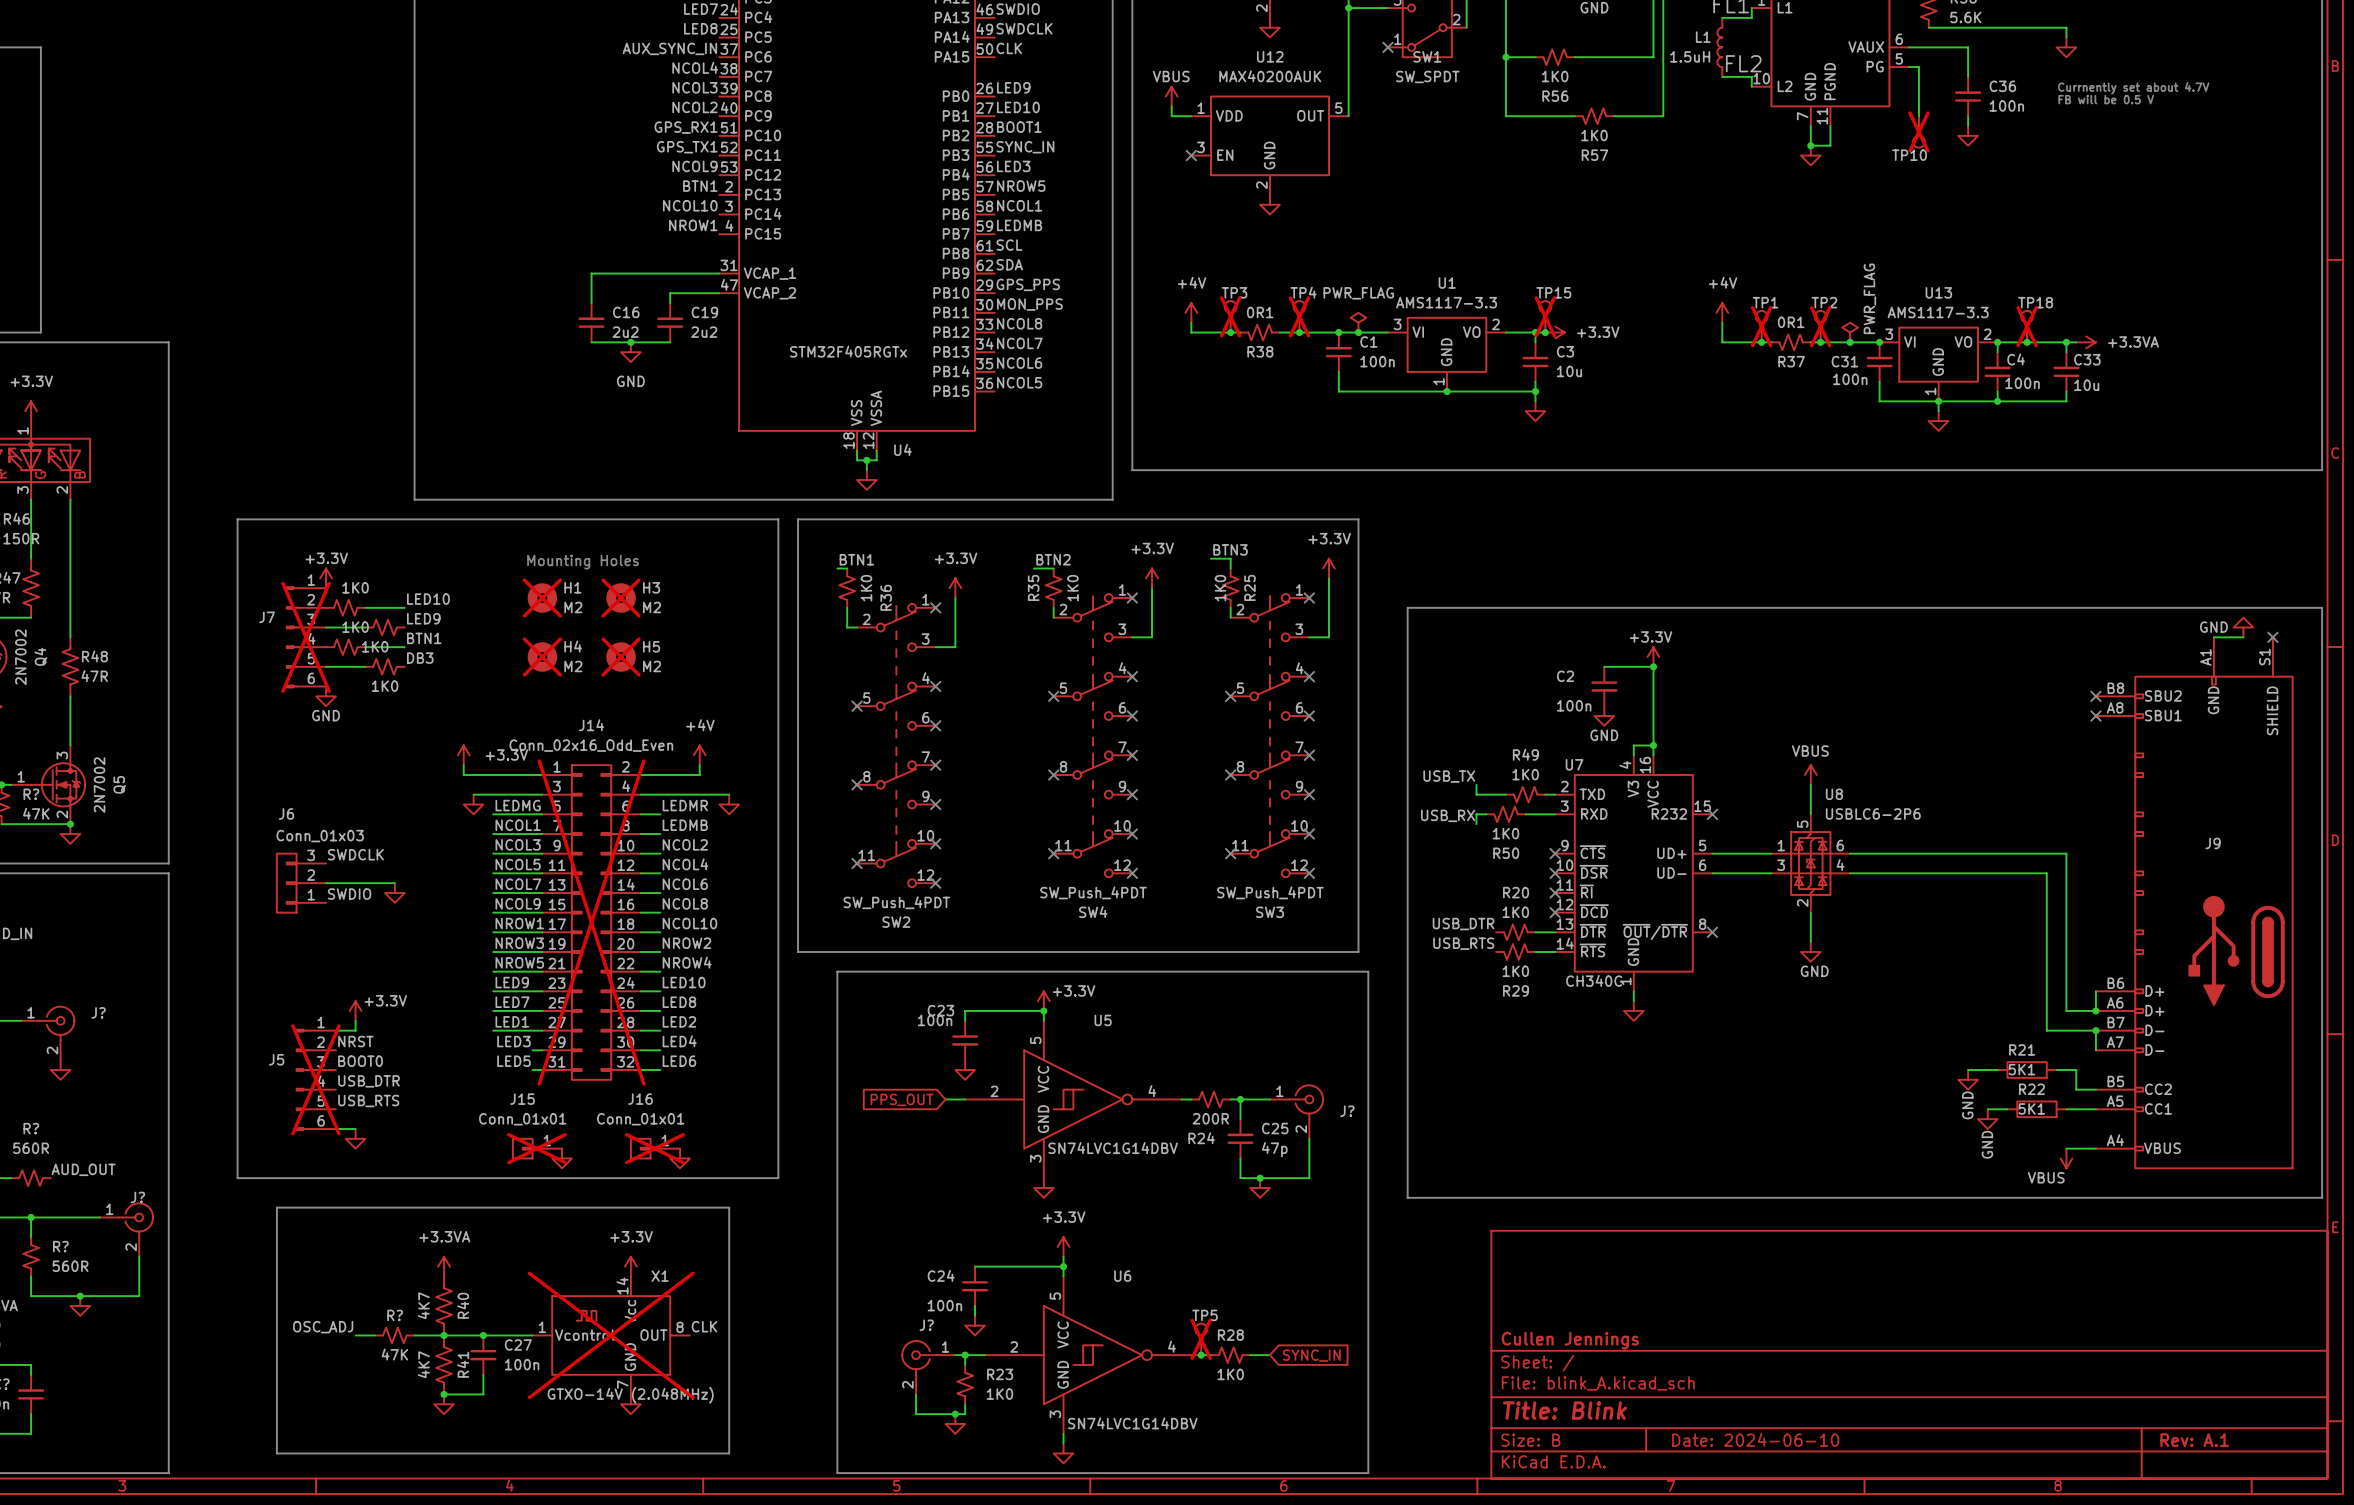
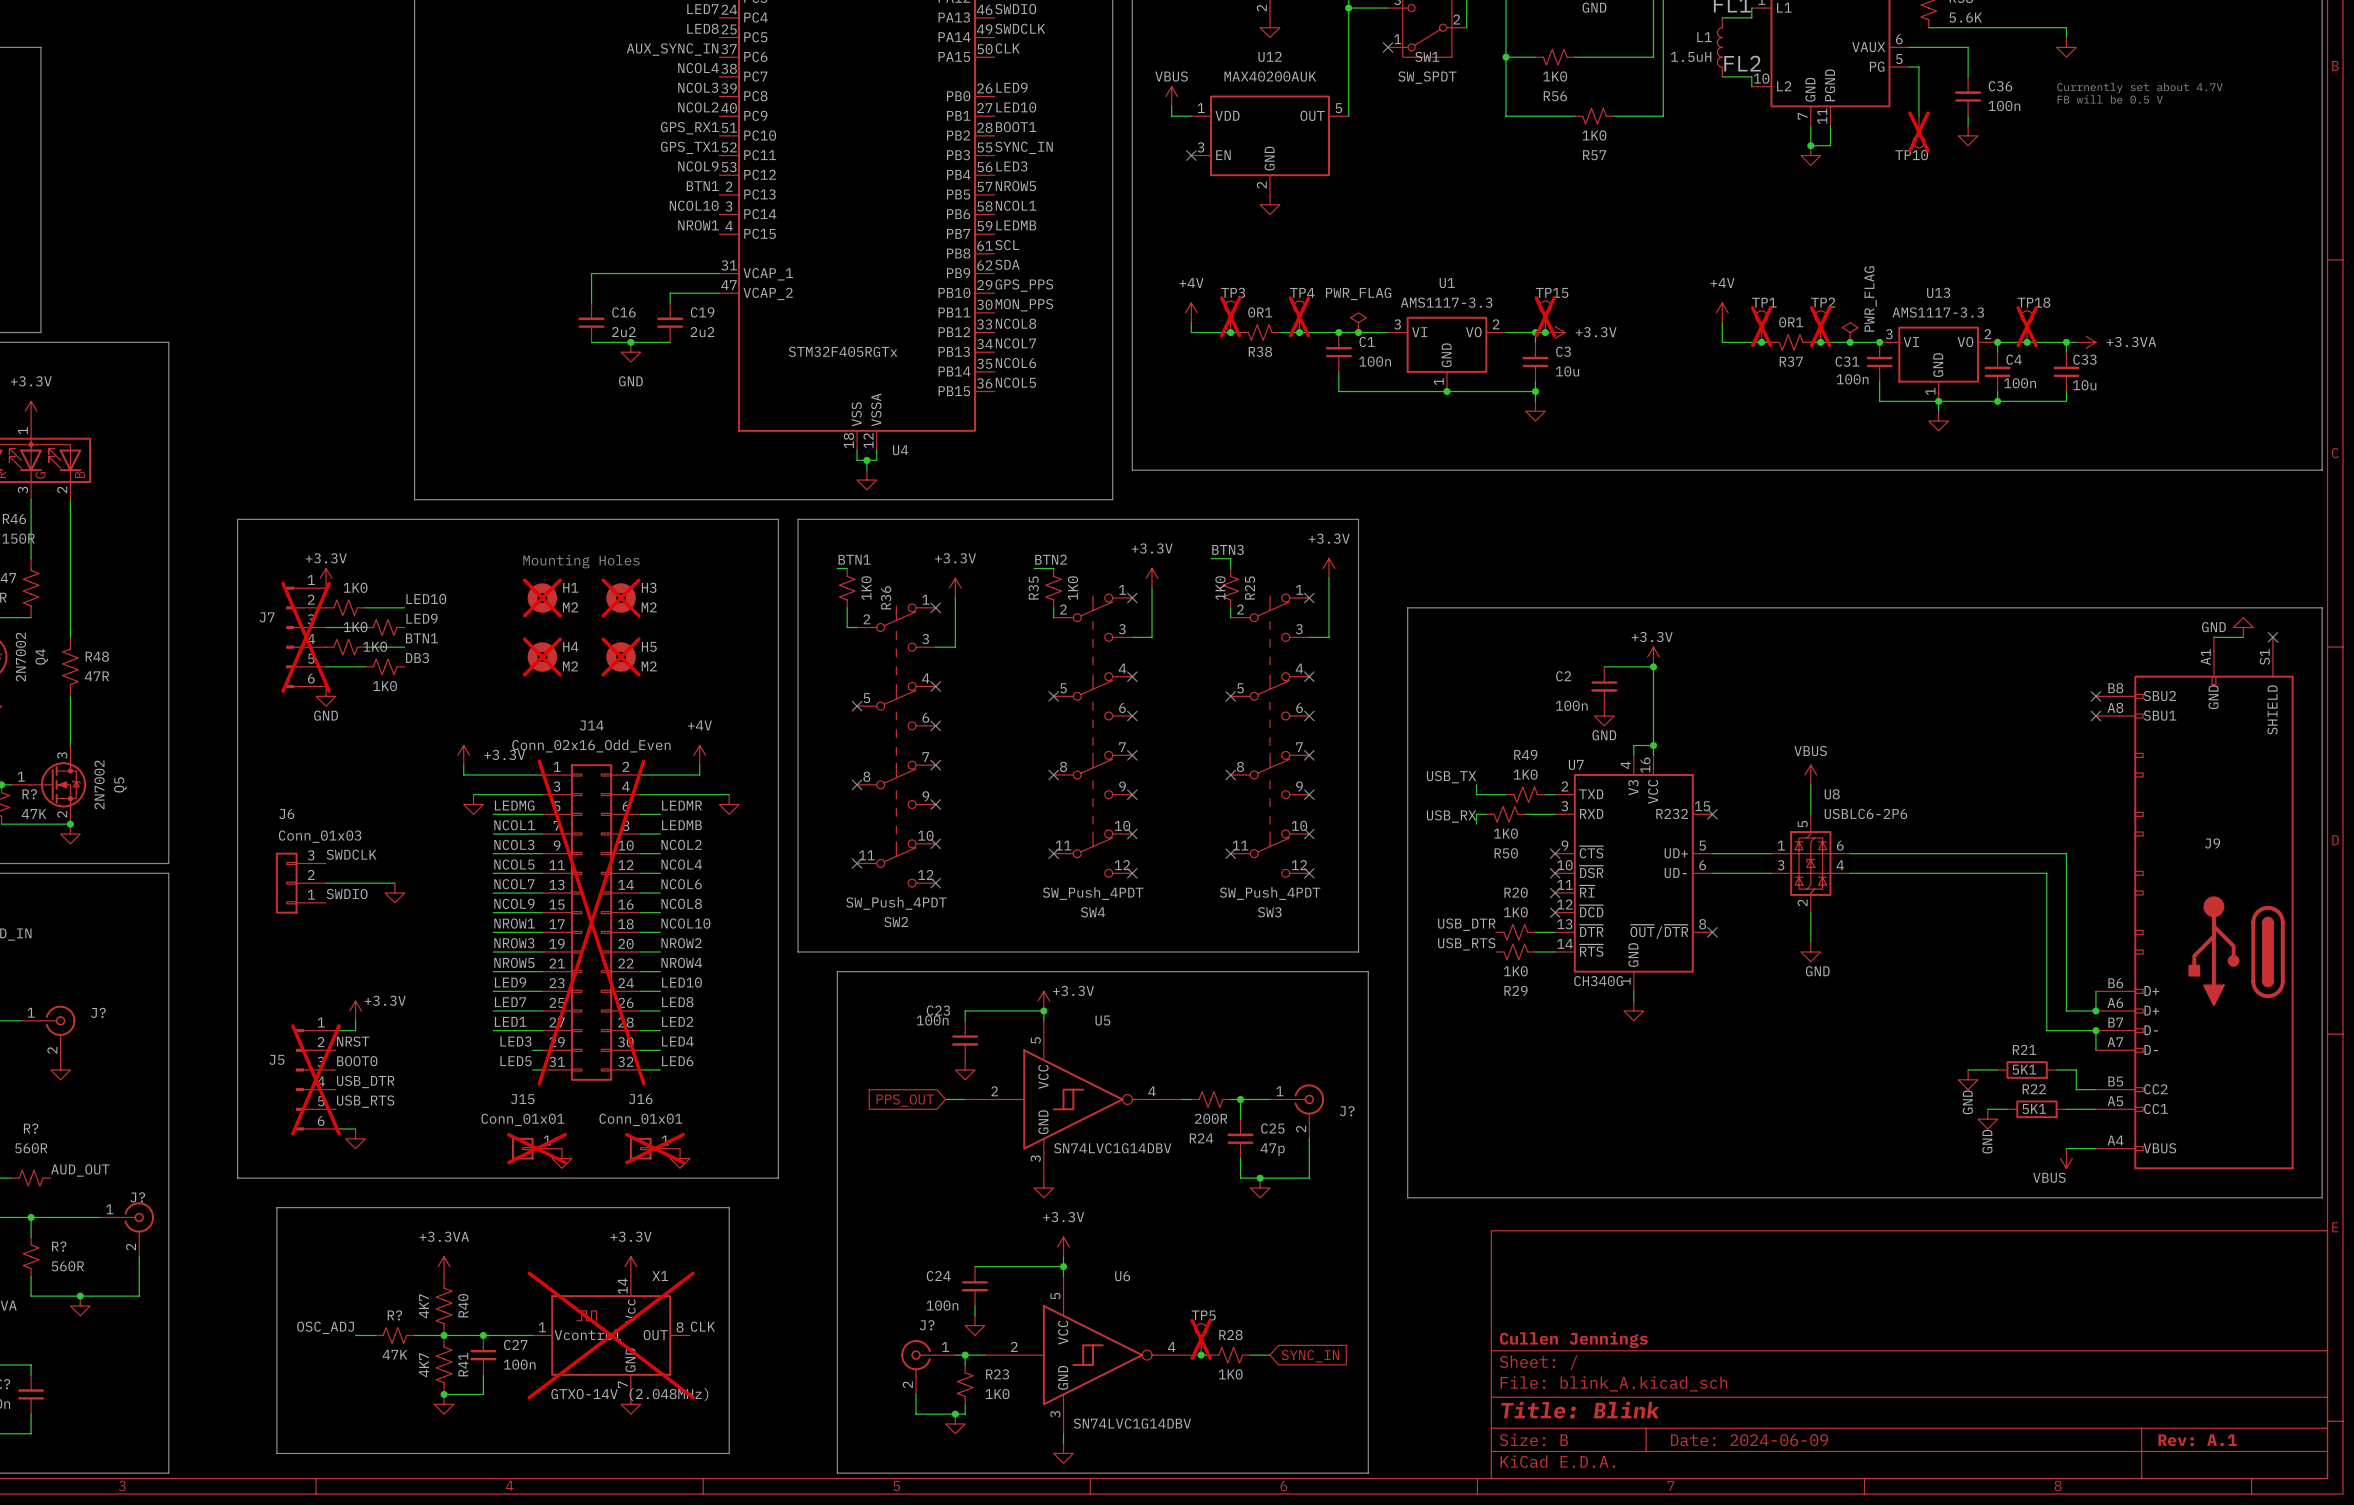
title block: Date: 2024-06-10 (1755, 1439) -> Date: 2024-06-09 (1749, 1440)

